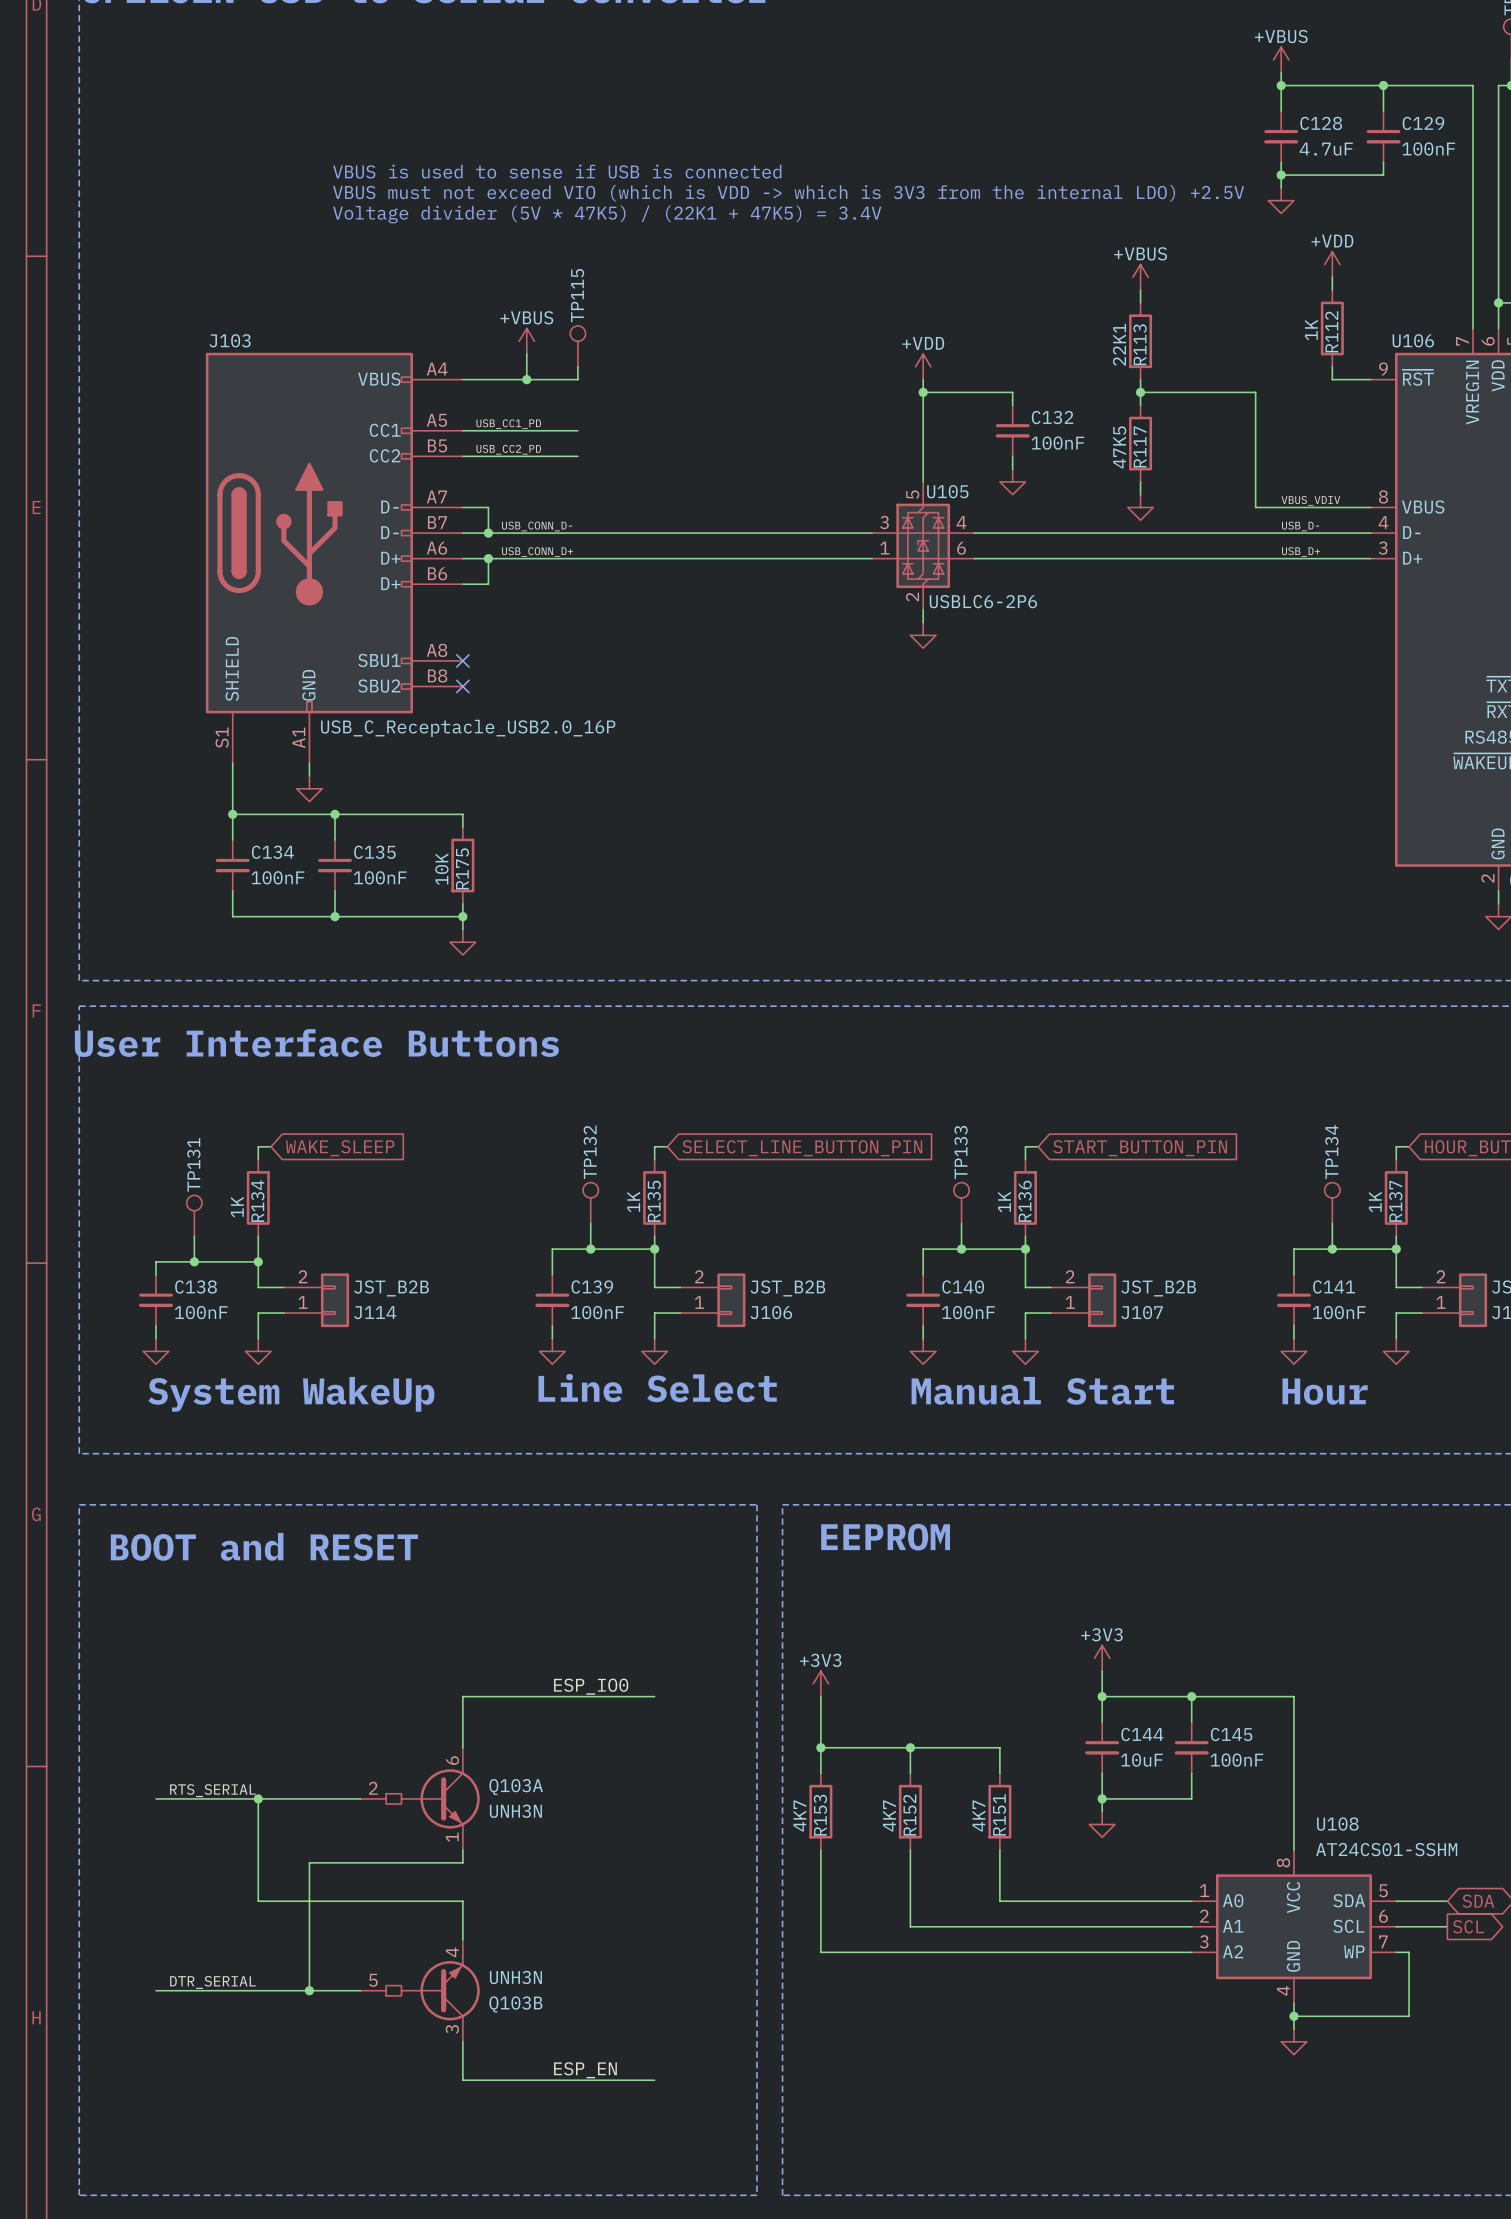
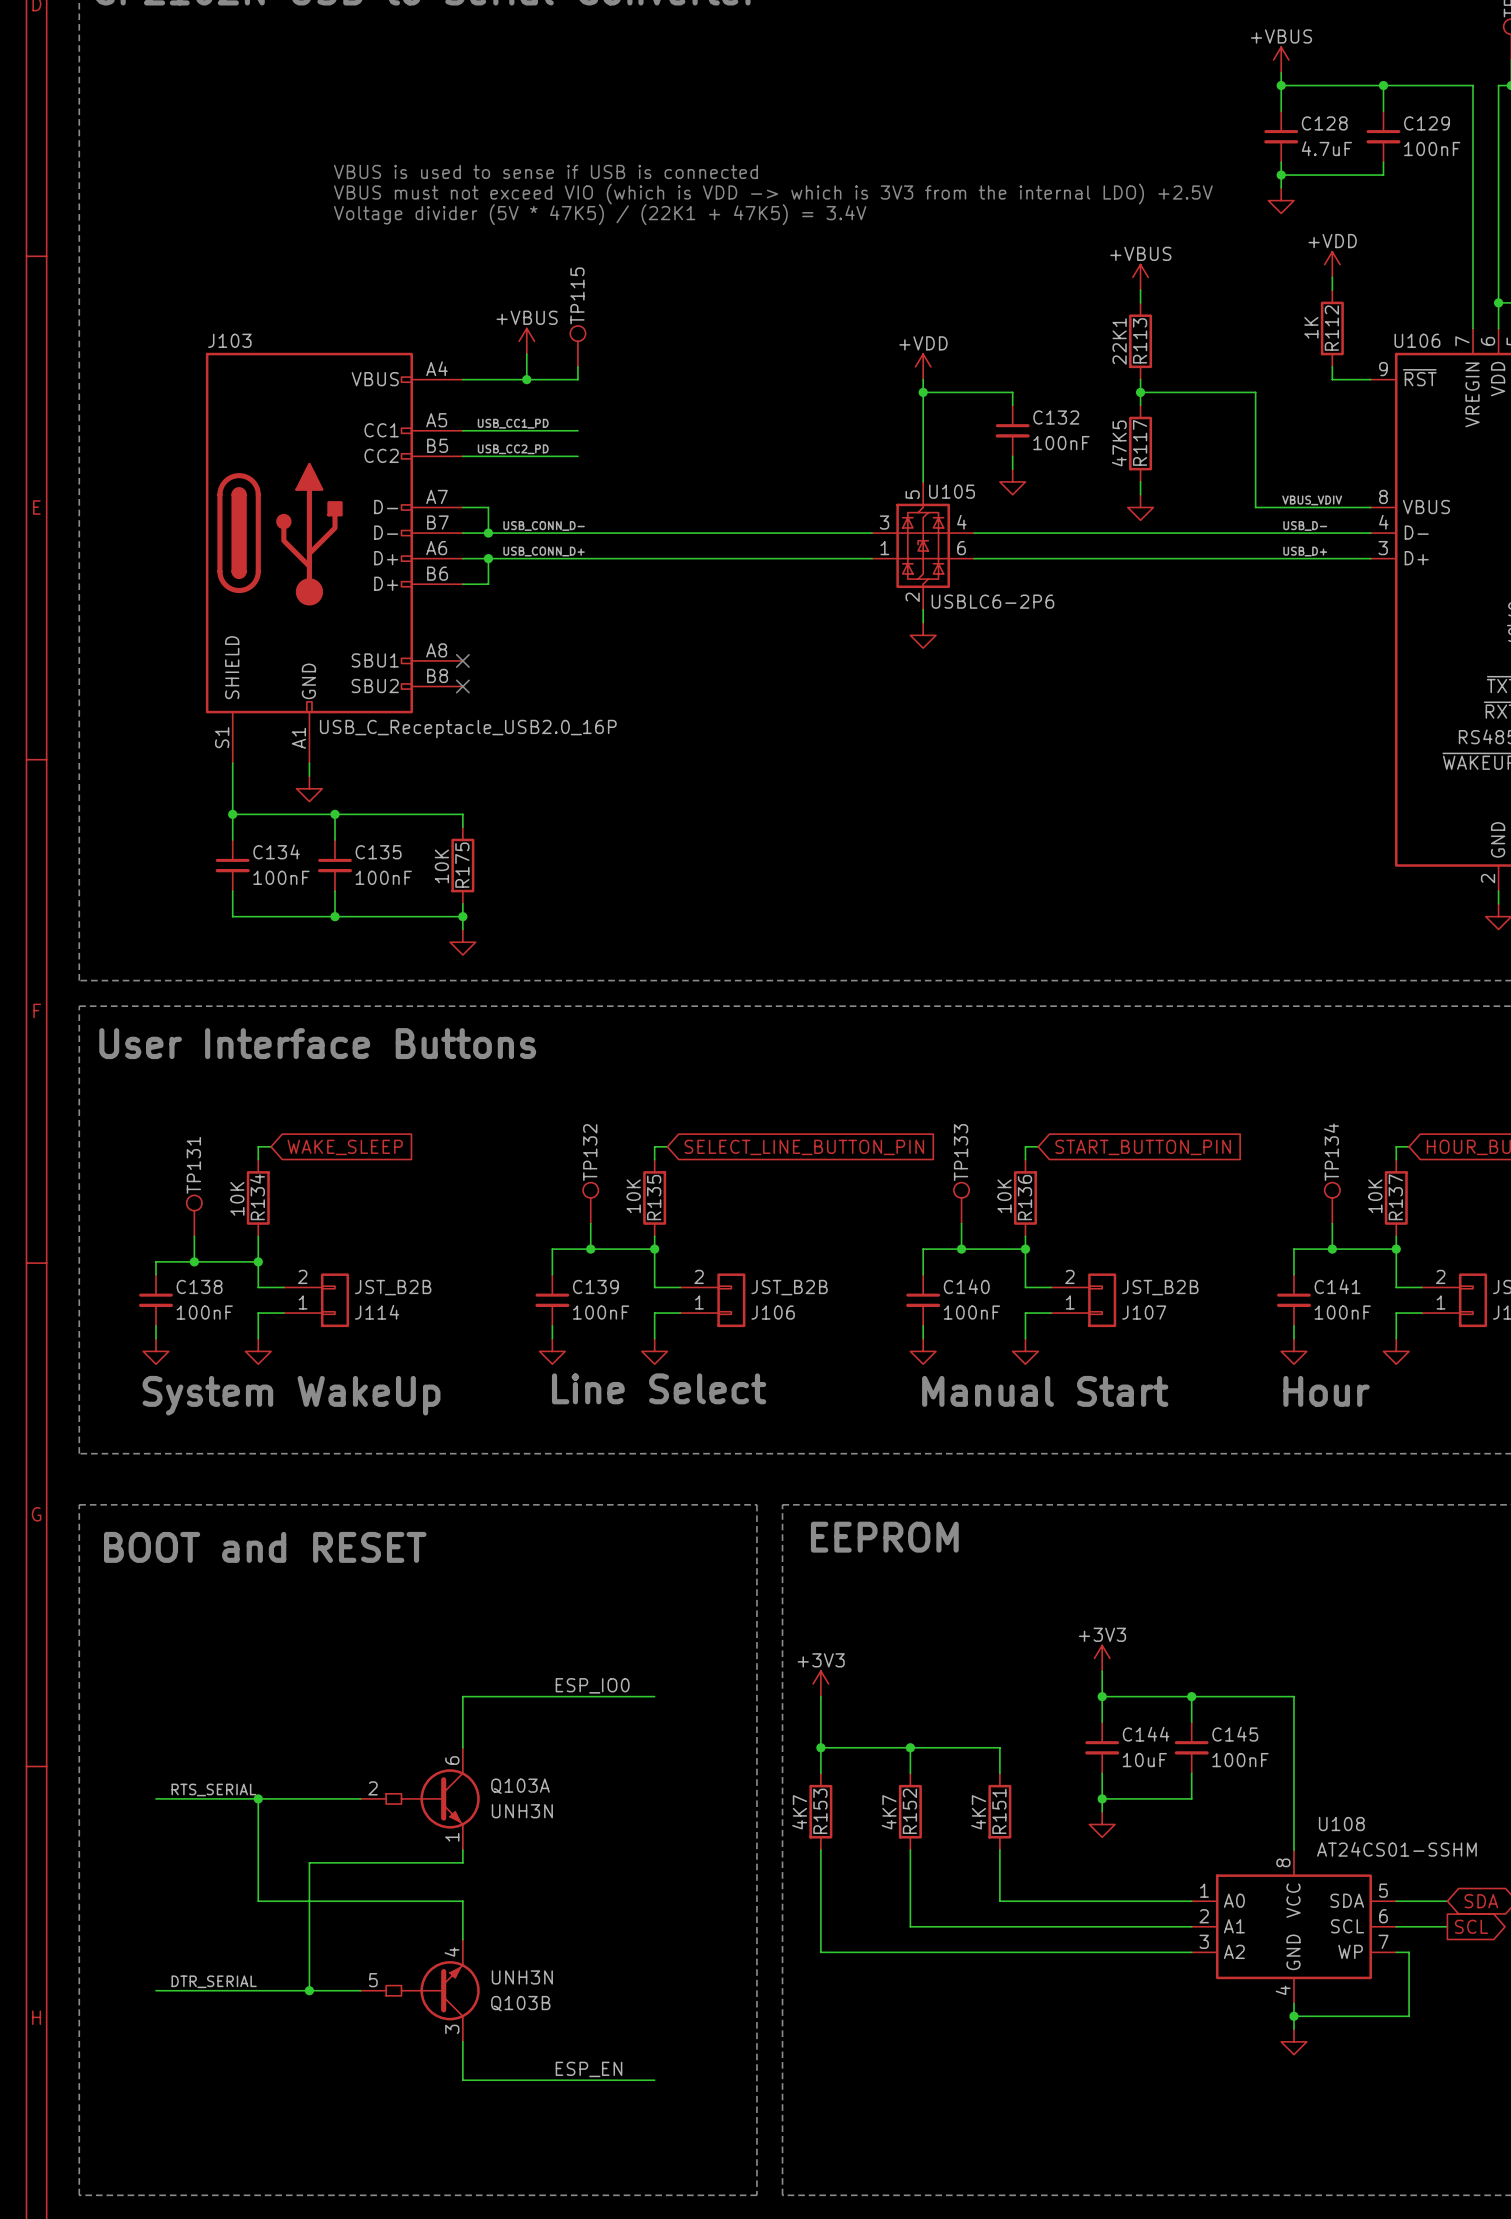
R135 value: 1K (633, 1202) -> 10K (633, 1196)
R136 value: 1K (1004, 1202) -> 10K (1004, 1196)
R137 value: 1K (1375, 1202) -> 10K (1375, 1196)
R134 value: 1K (237, 1207) -> 10K (237, 1198)

